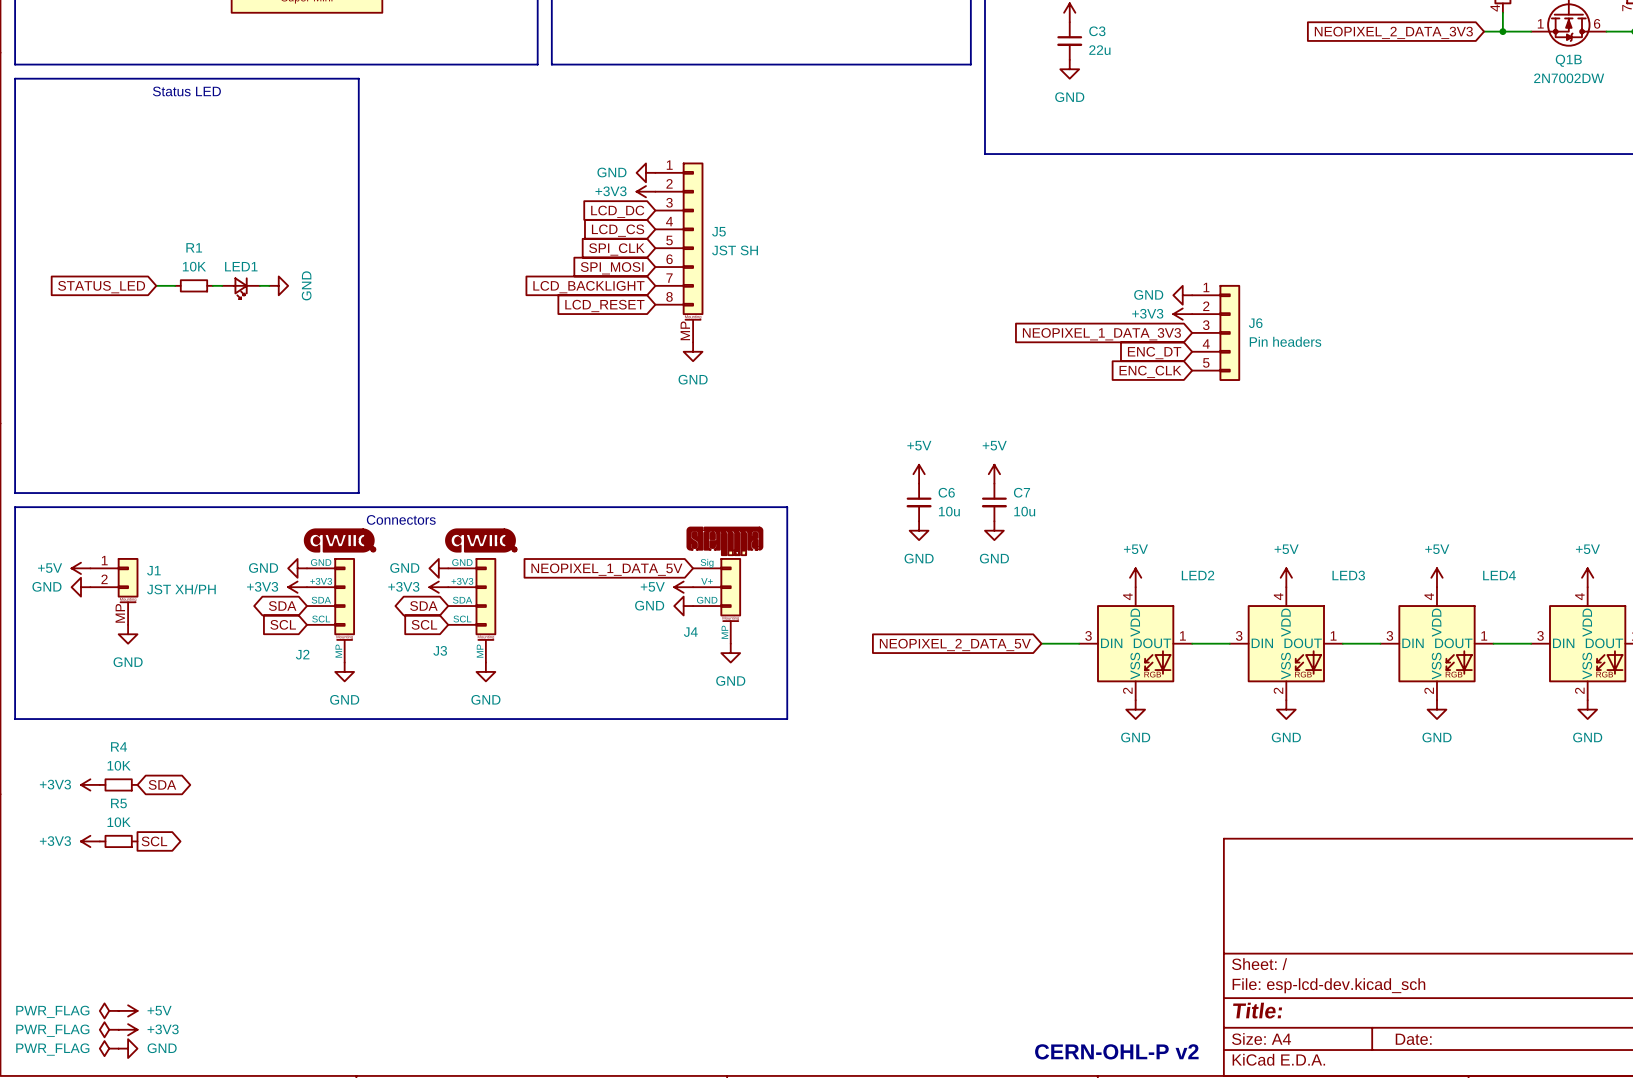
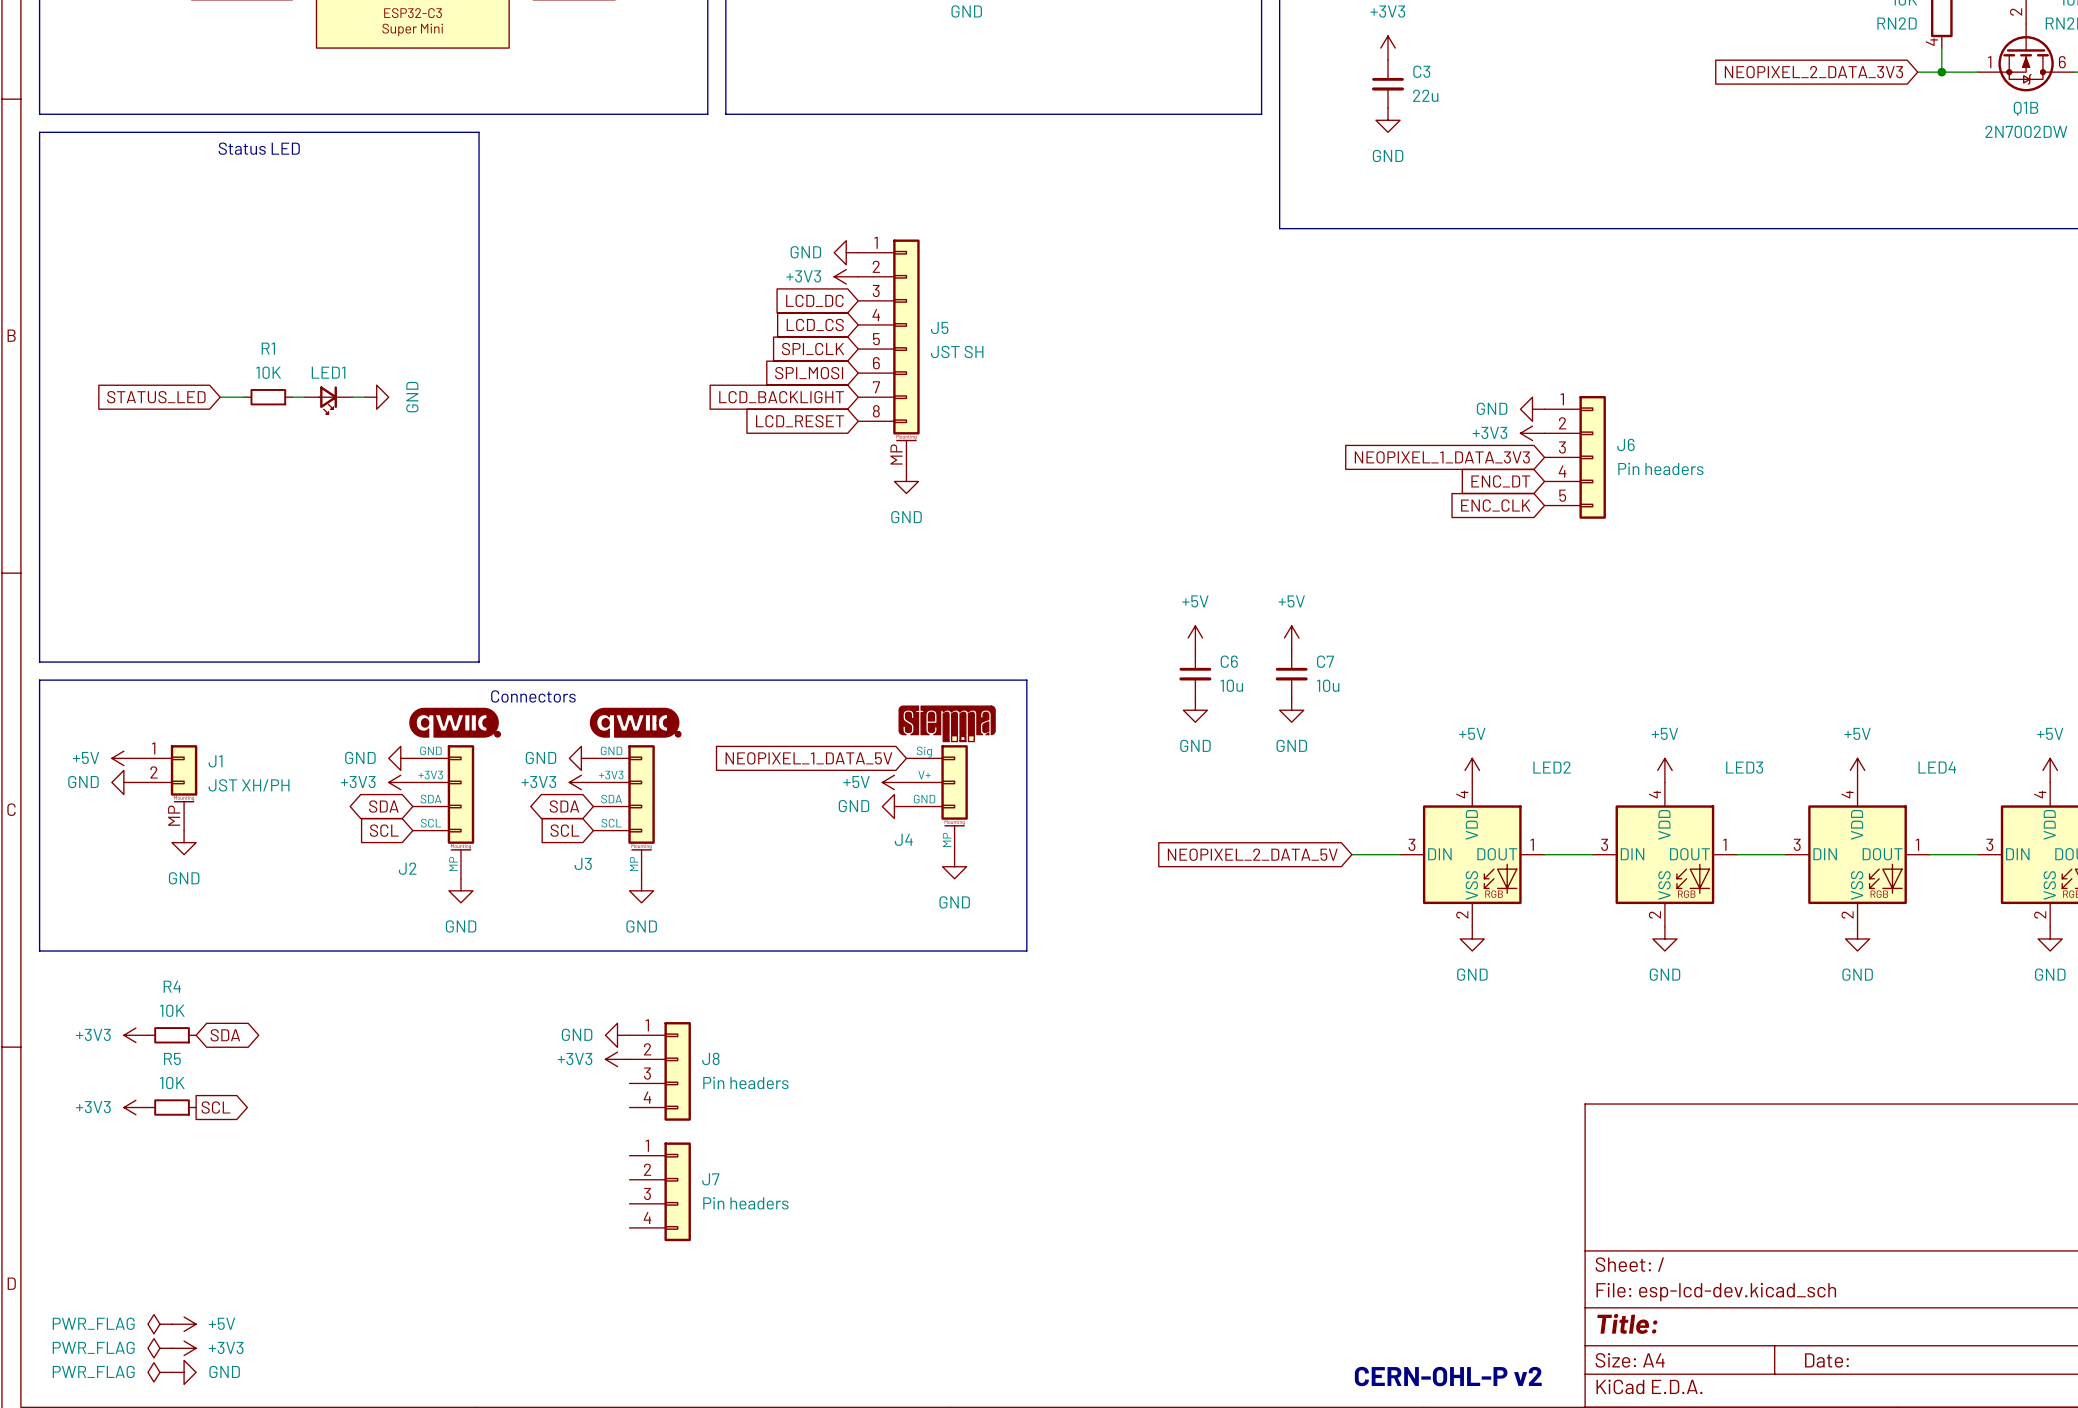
power symbol: none -> GND (617, 1035)
power symbol: none -> +3V3 (617, 1059)
J8: none -> Pin headers (660, 1071)
J7: none -> Pin headers (660, 1191)

